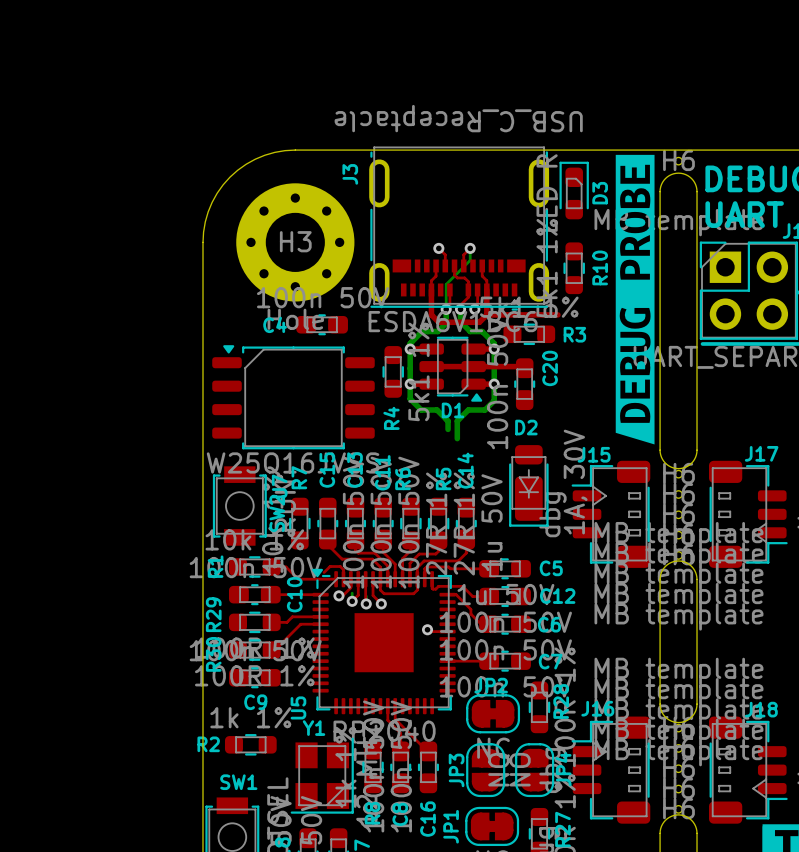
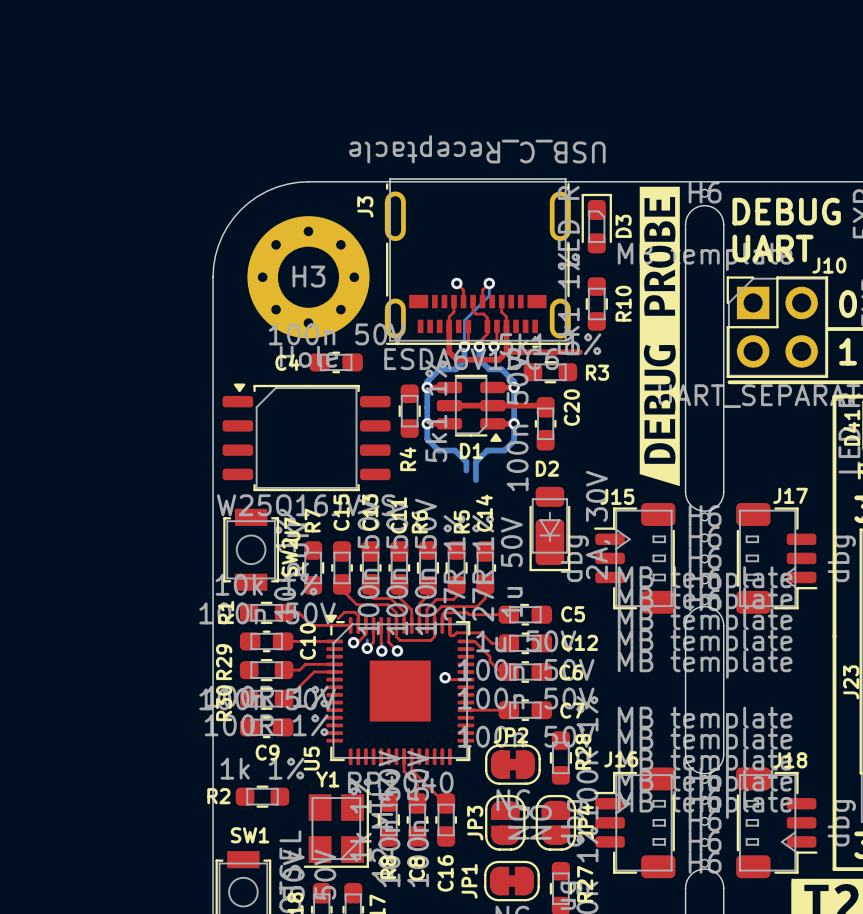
D2 value: 1A, 30V (575, 482) -> 2A, 30V (598, 525)

